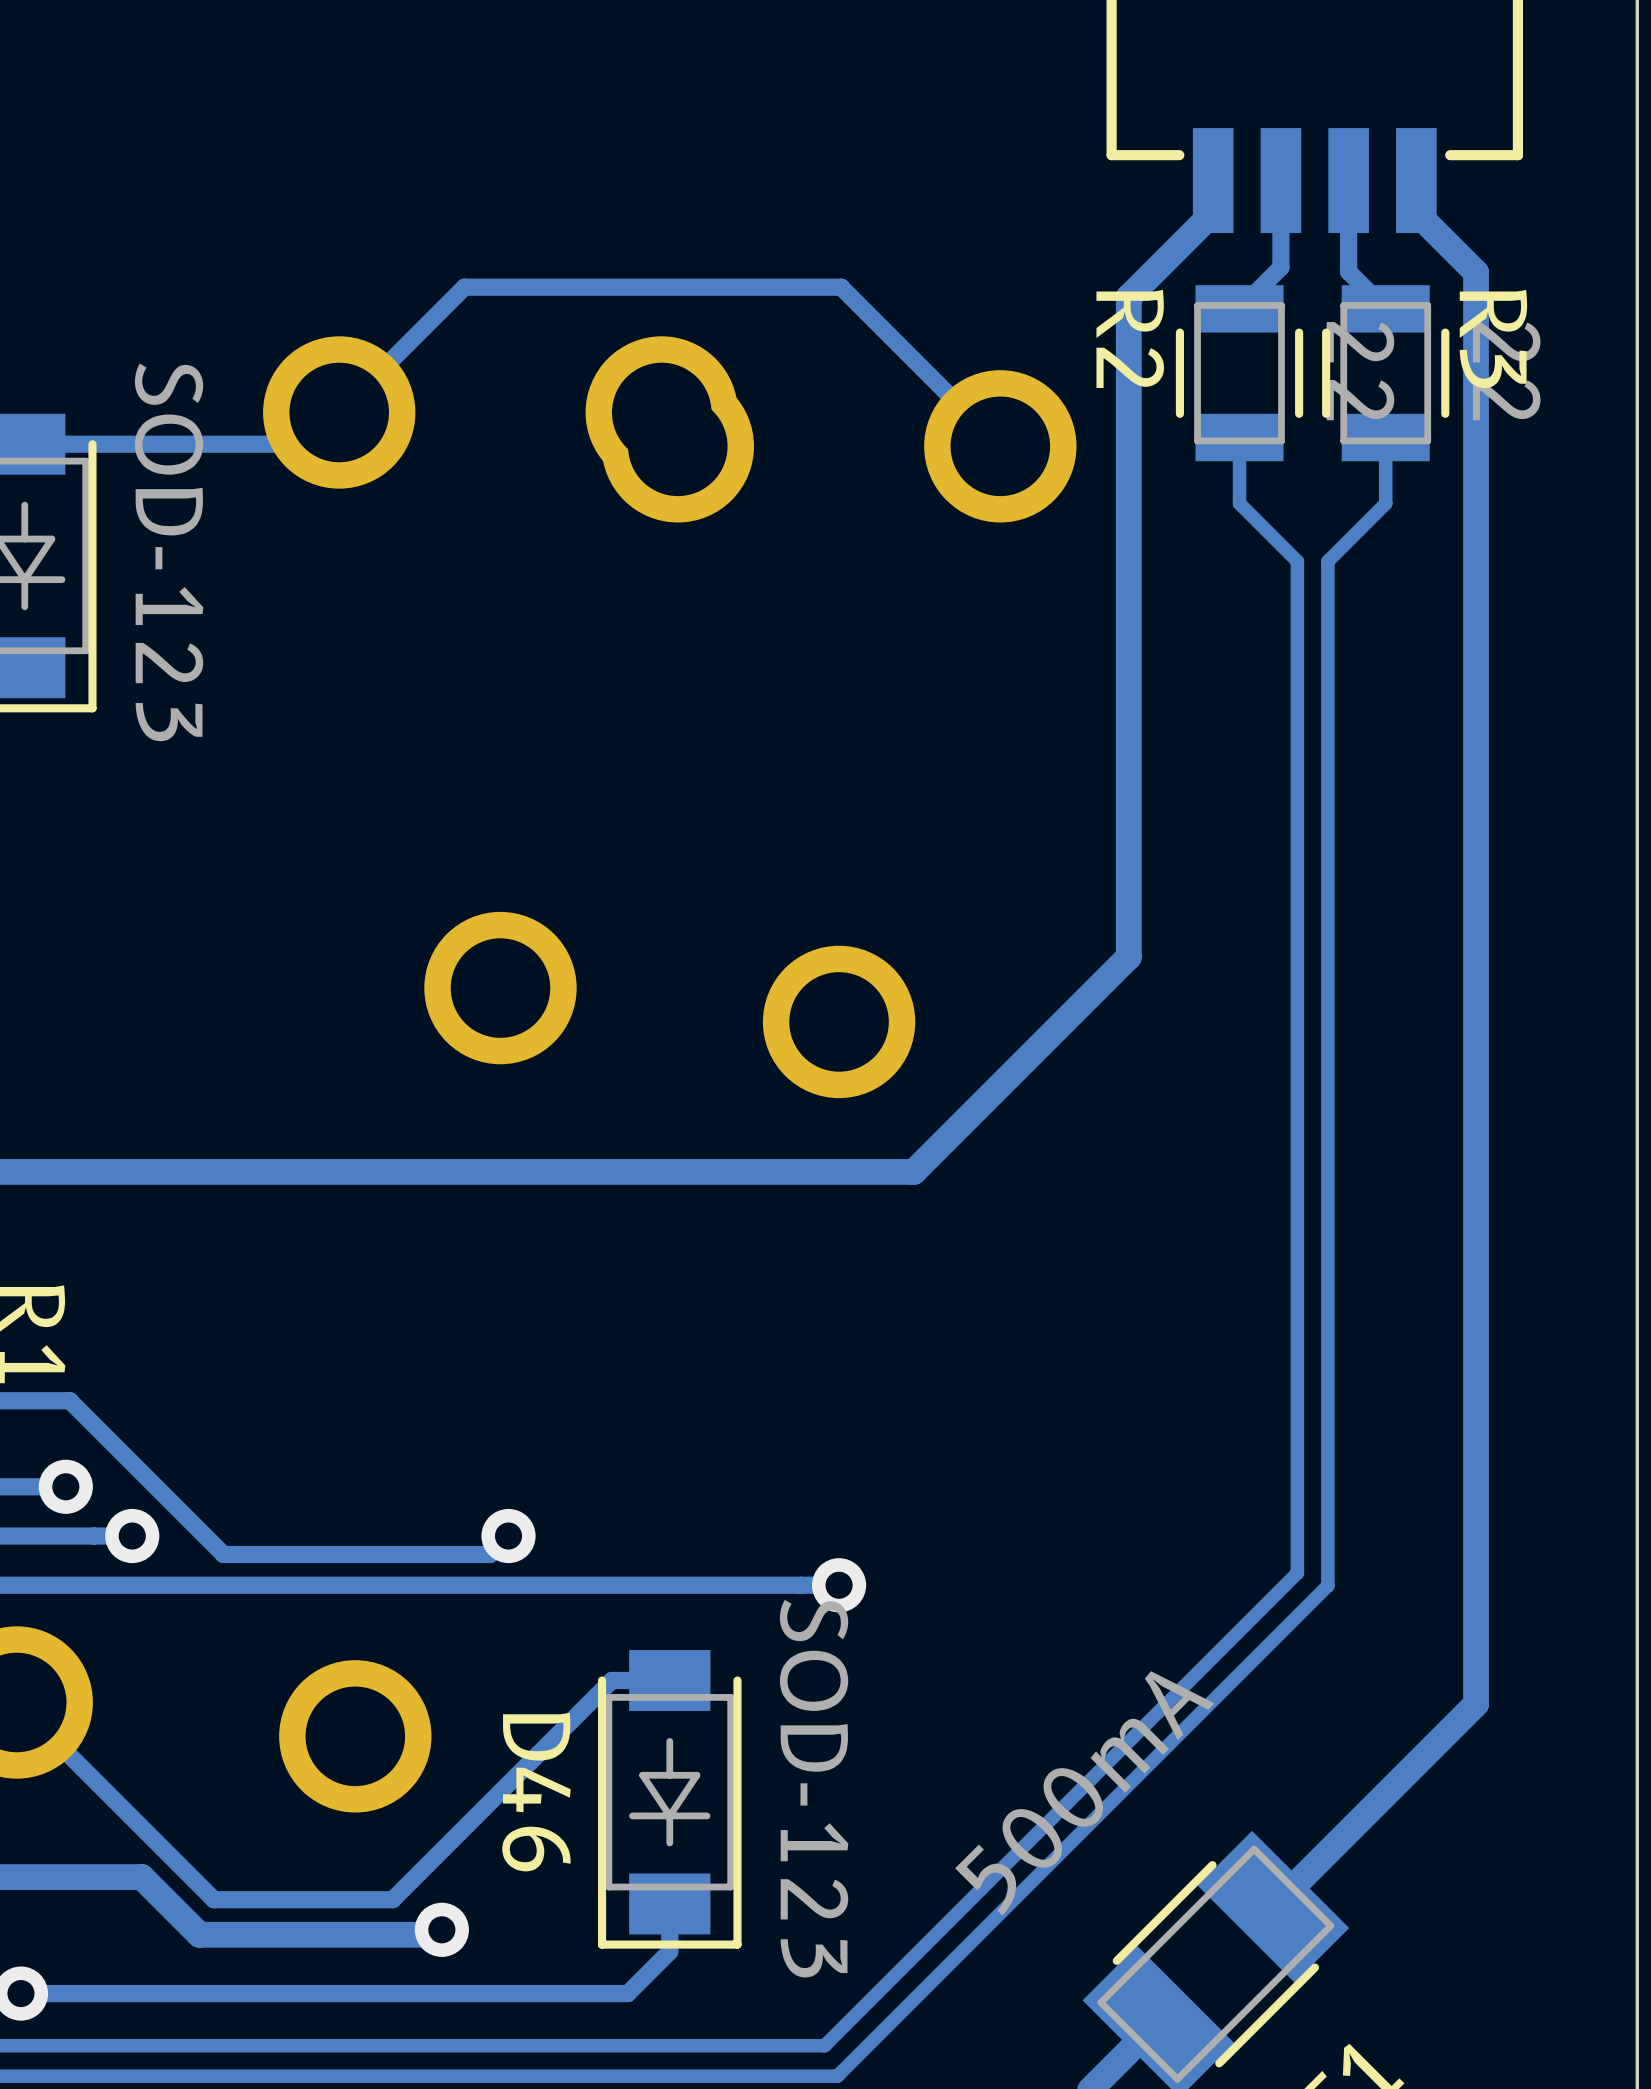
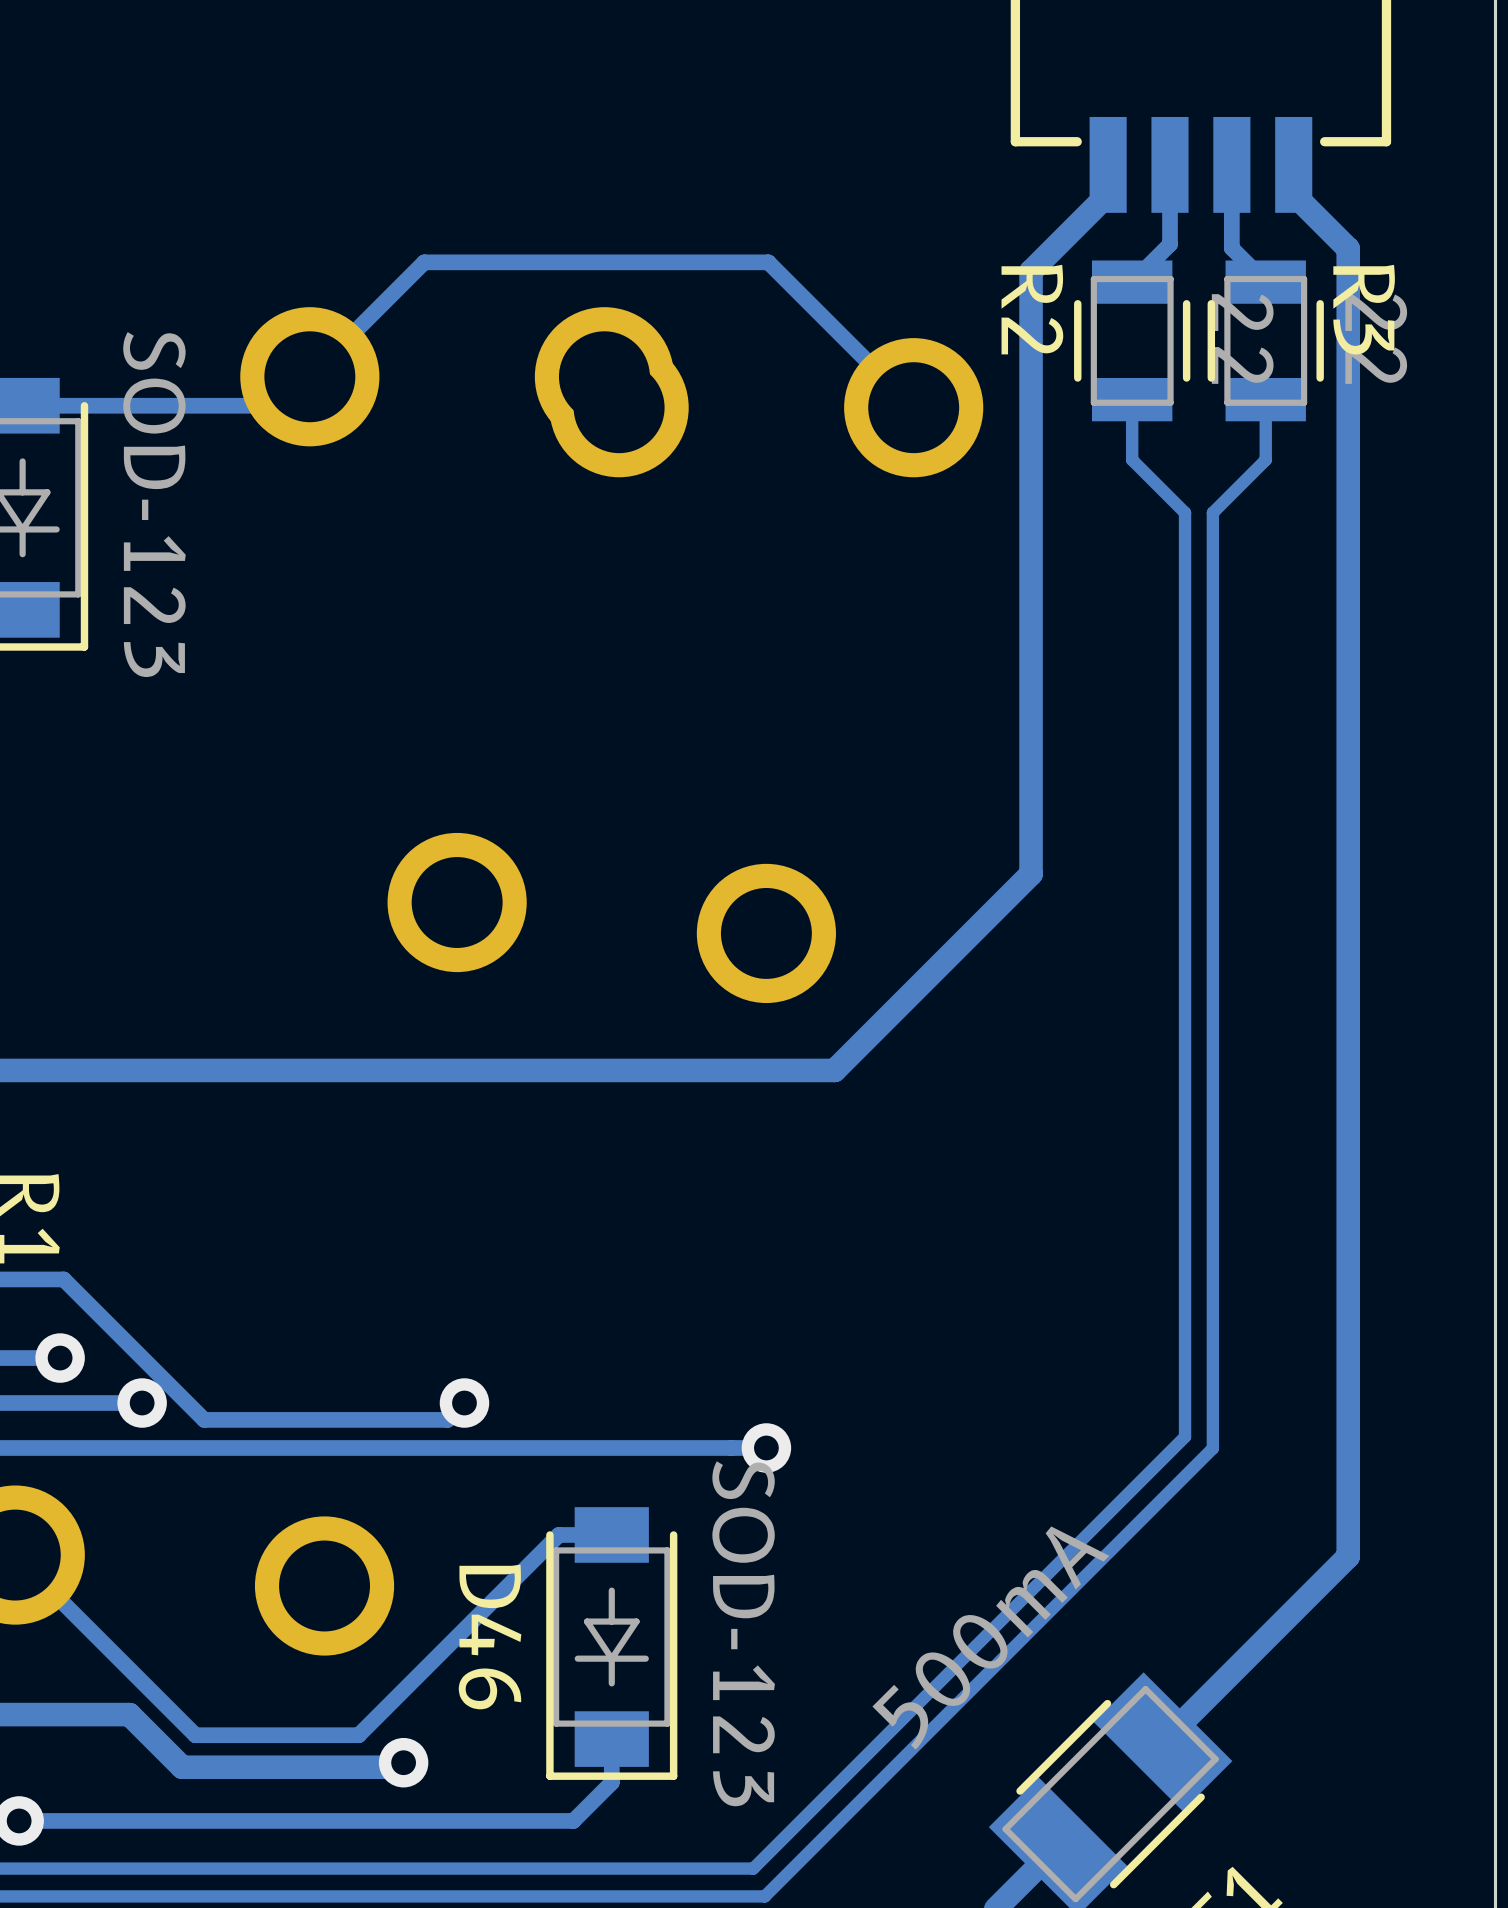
via position: (132, 1536) -> (142, 1403)

